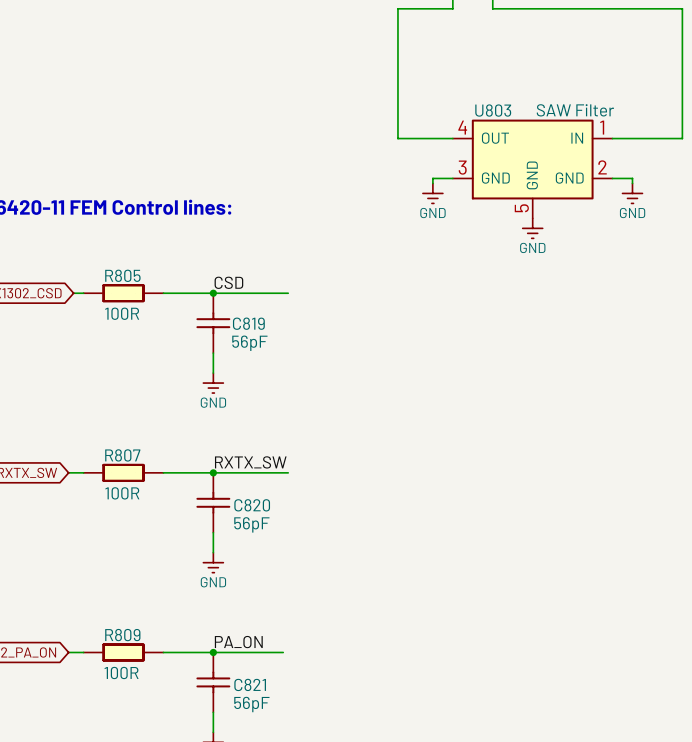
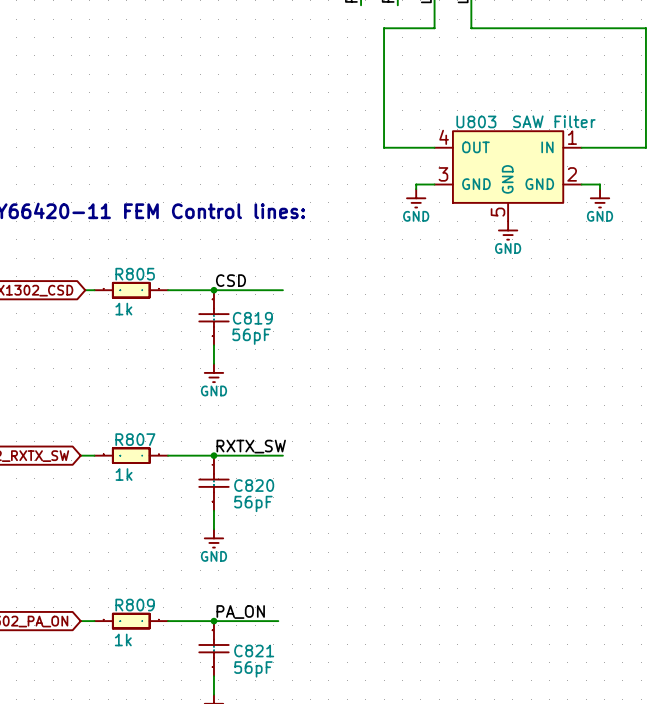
R805 value: 100R (122, 313) -> 1k (123, 309)
R807 value: 100R (122, 493) -> 1k (124, 474)
R809 value: 100R (121, 672) -> 1k (123, 639)

